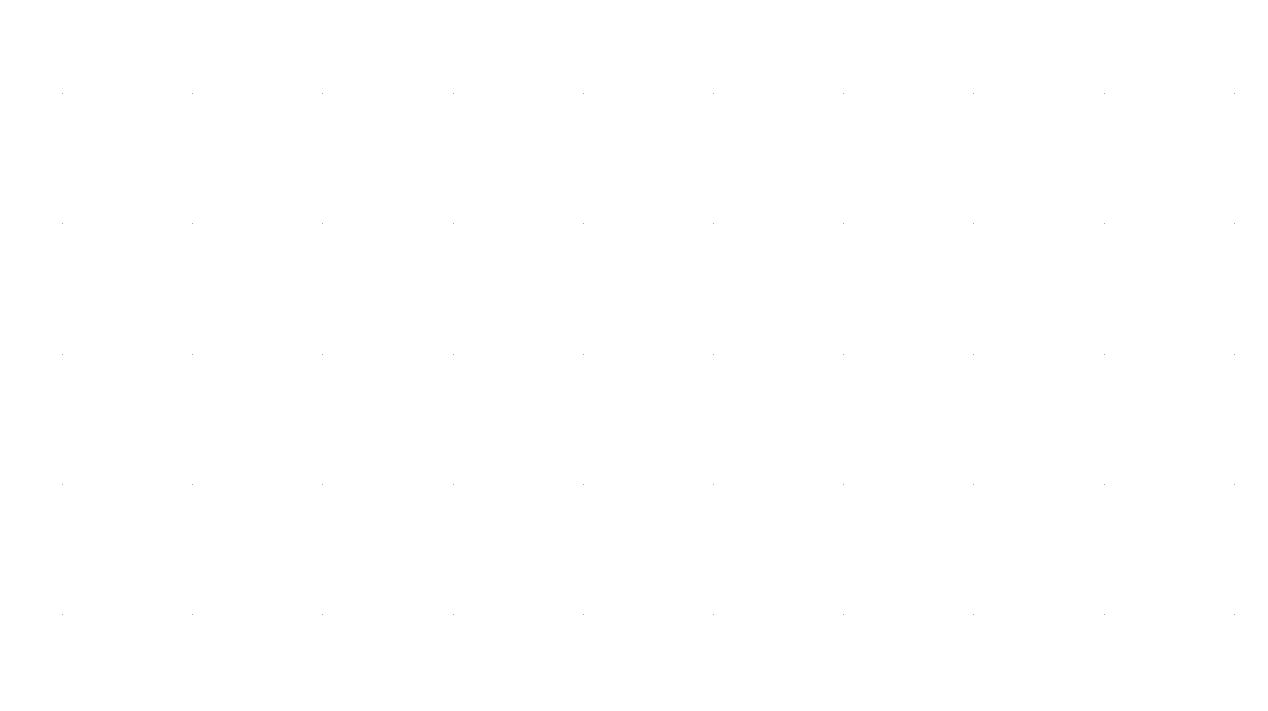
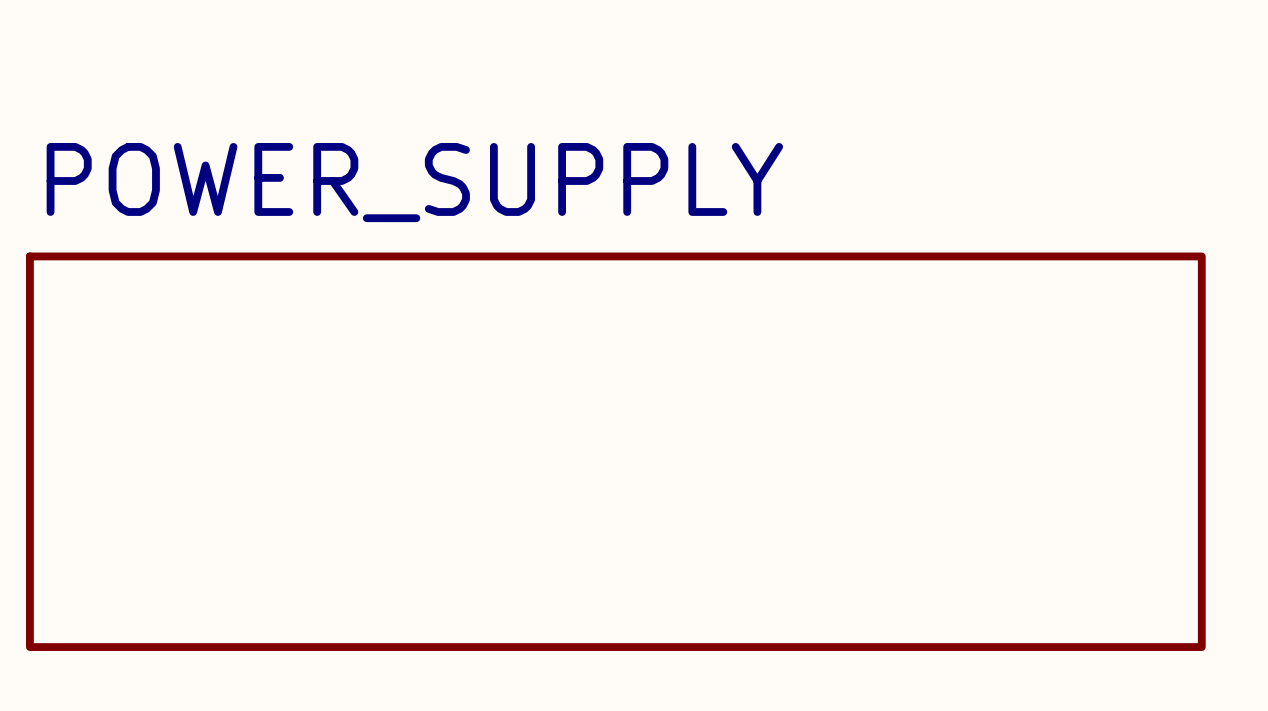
sheet POWER_SUPPLY: none -> (615, 451)

